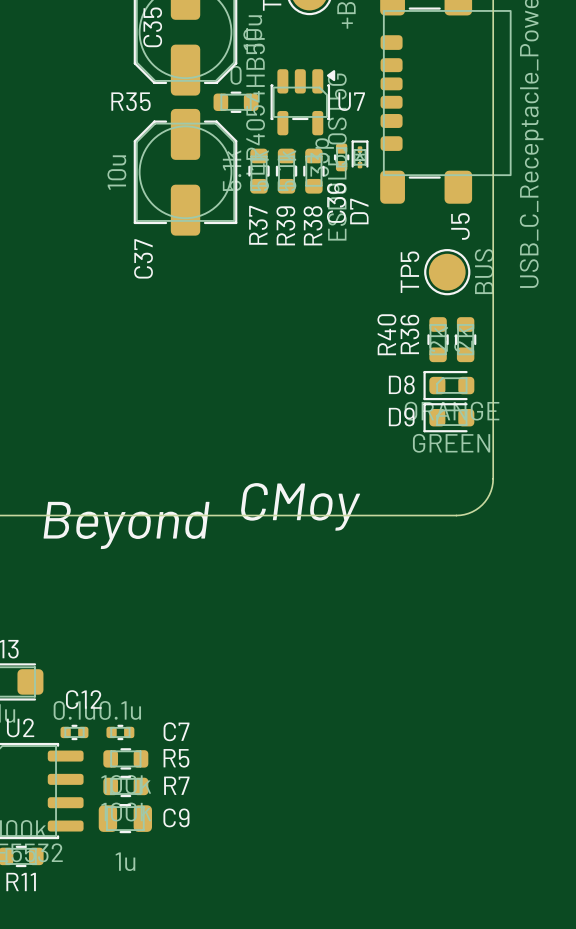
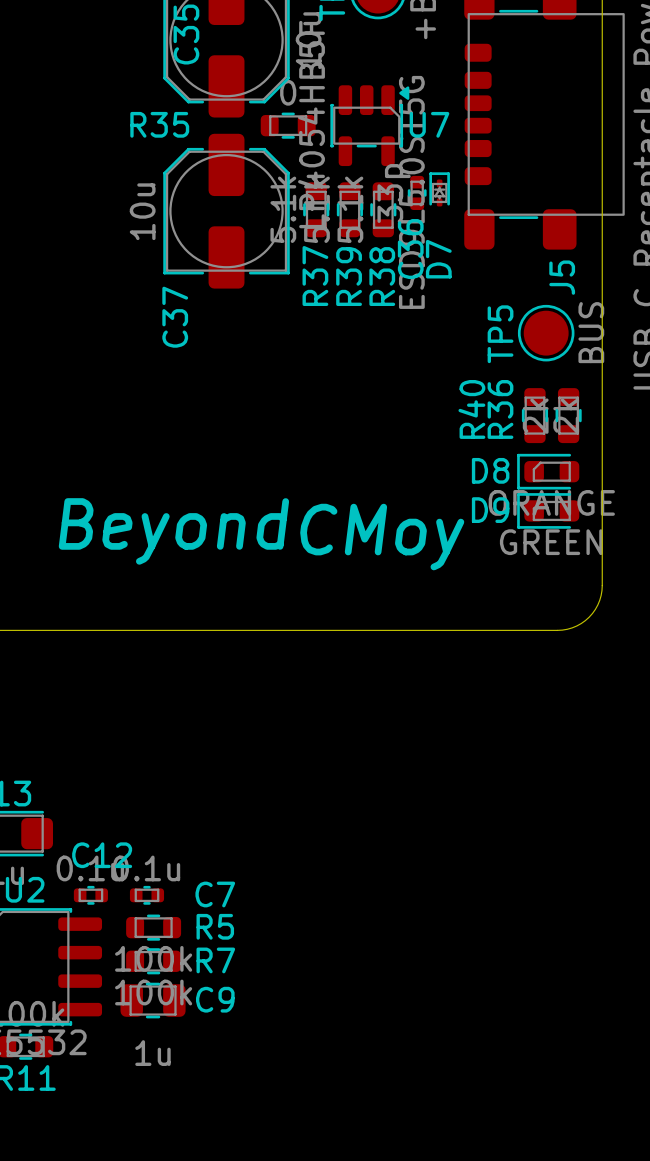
text position: CMoy (300, 506) -> CMoy (382, 537)
text position: Beyond (126, 525) -> Beyond (173, 531)

